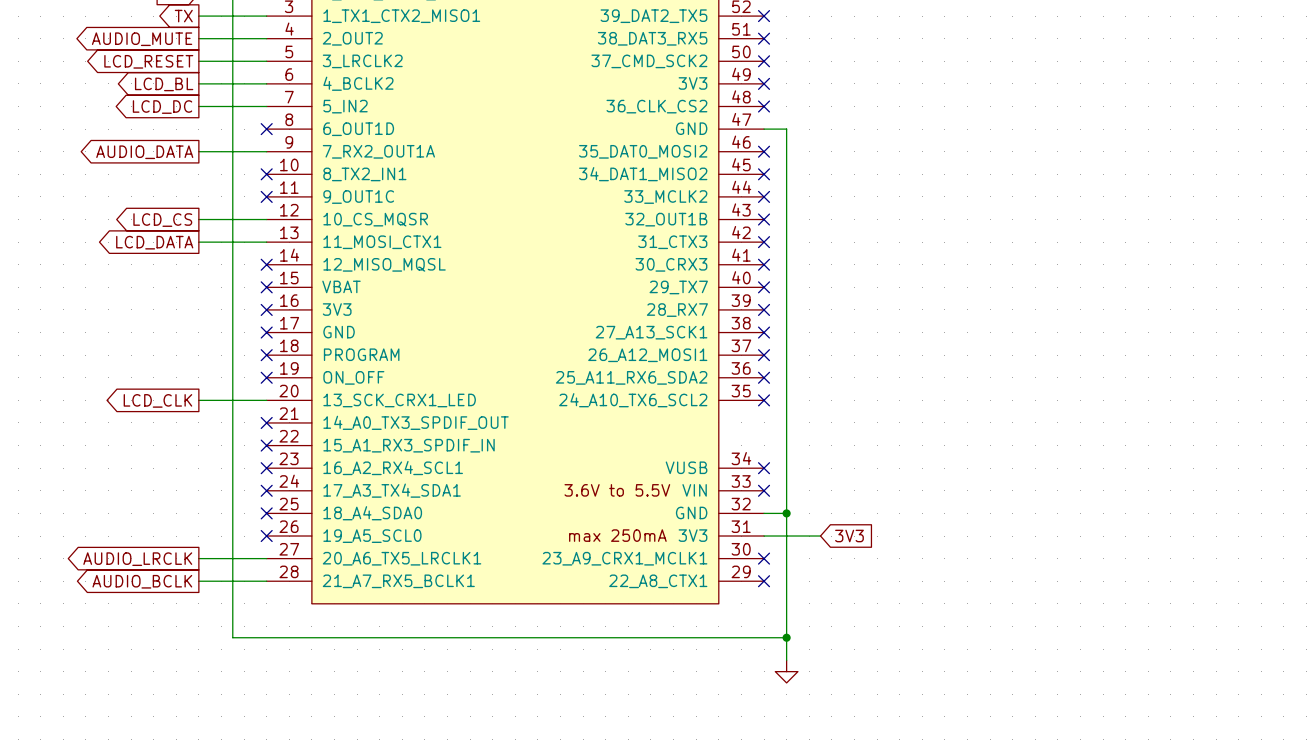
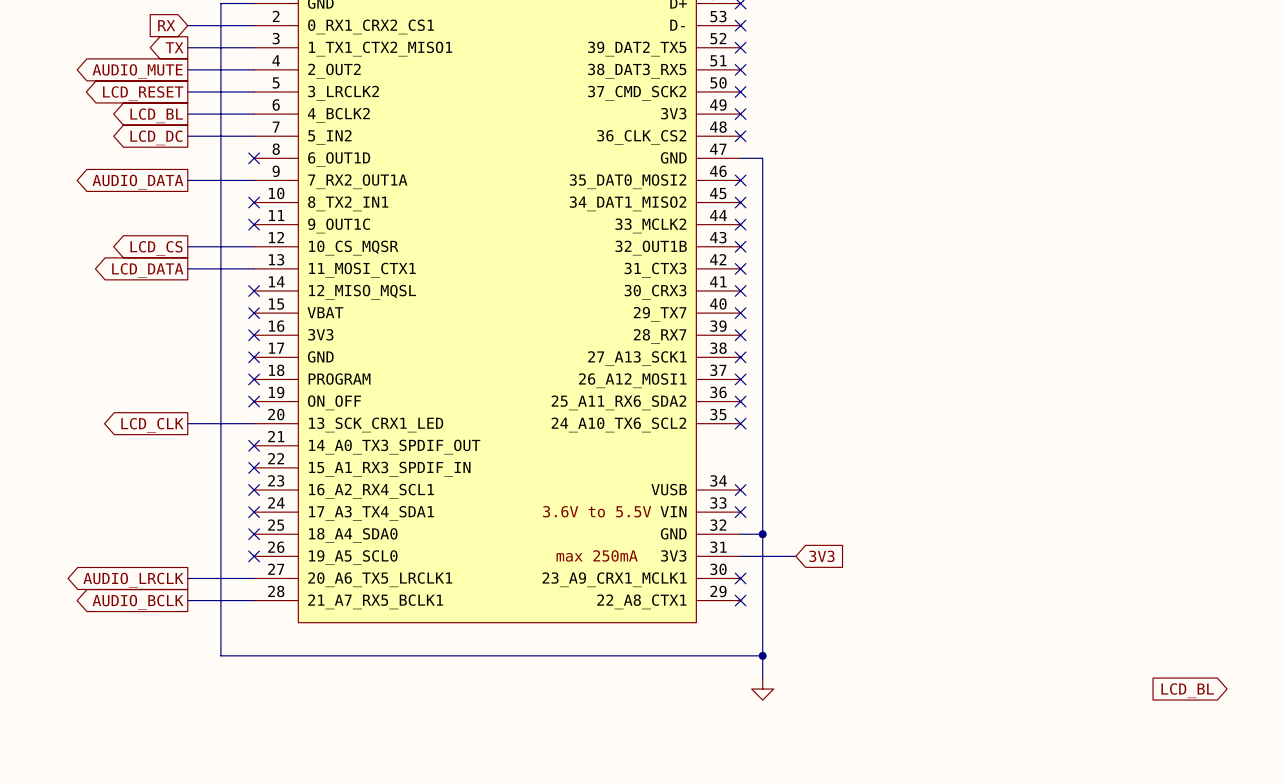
global label: none -> LCD_BL (1187, 690)

